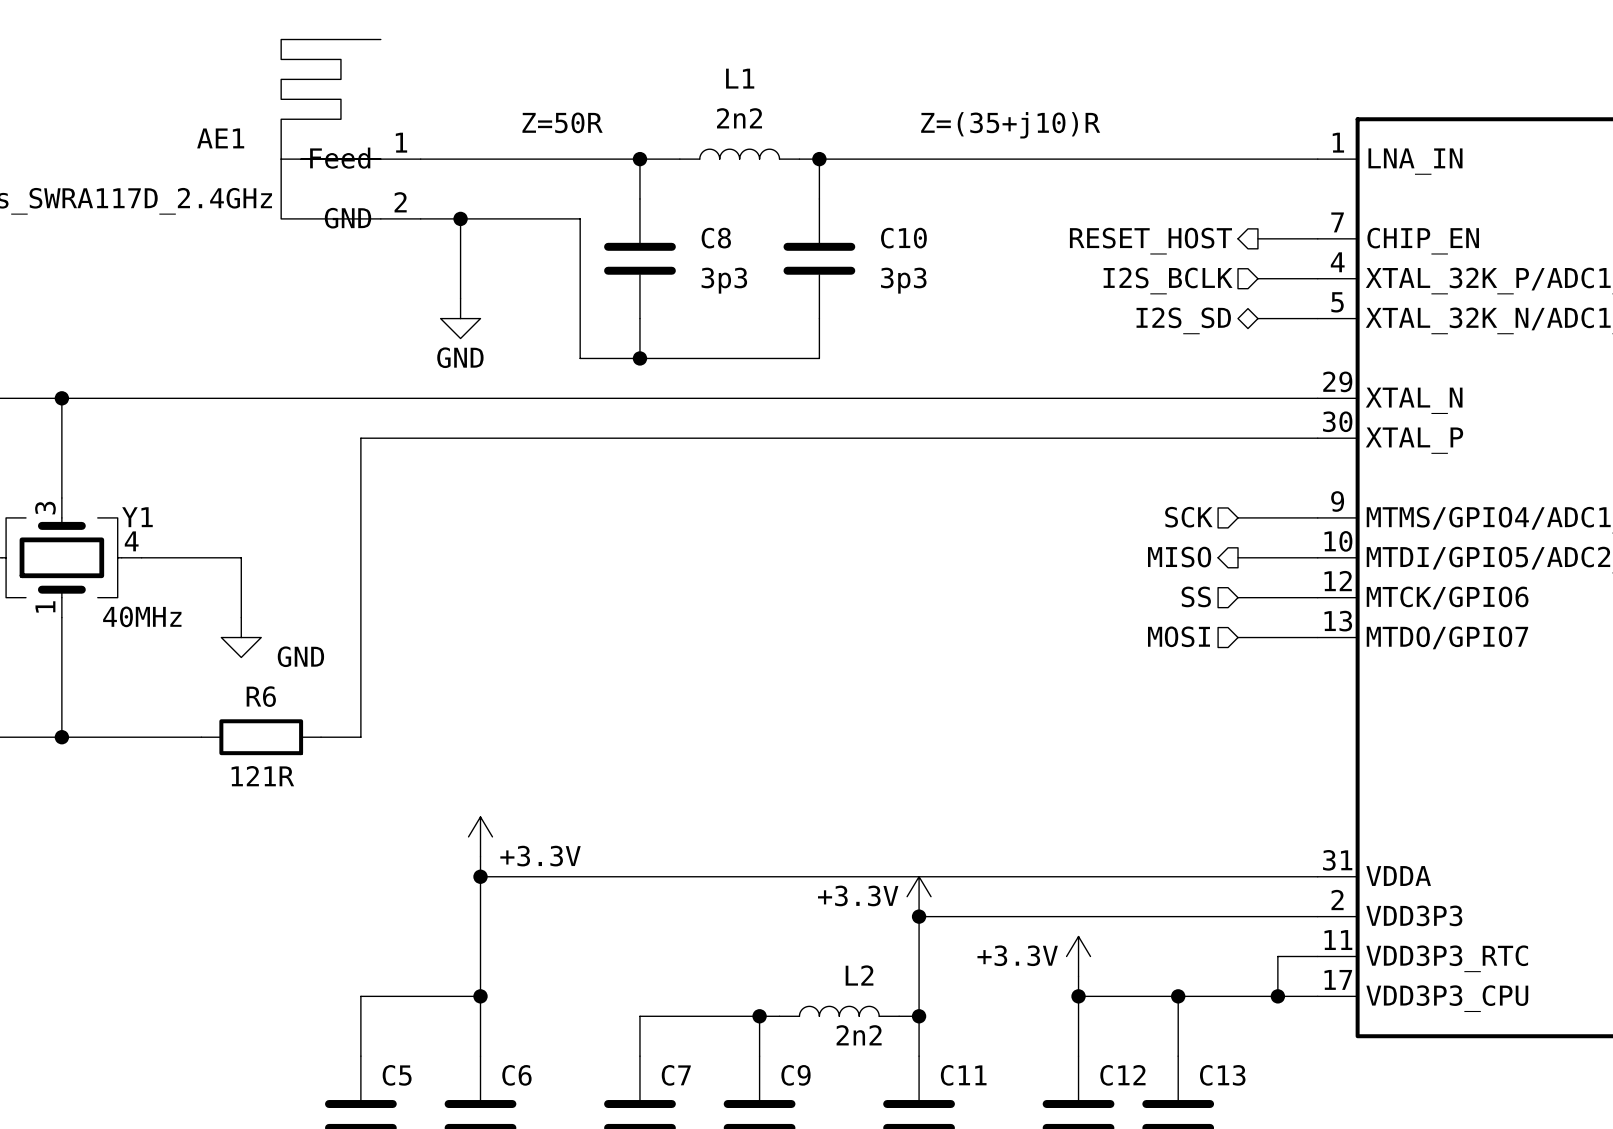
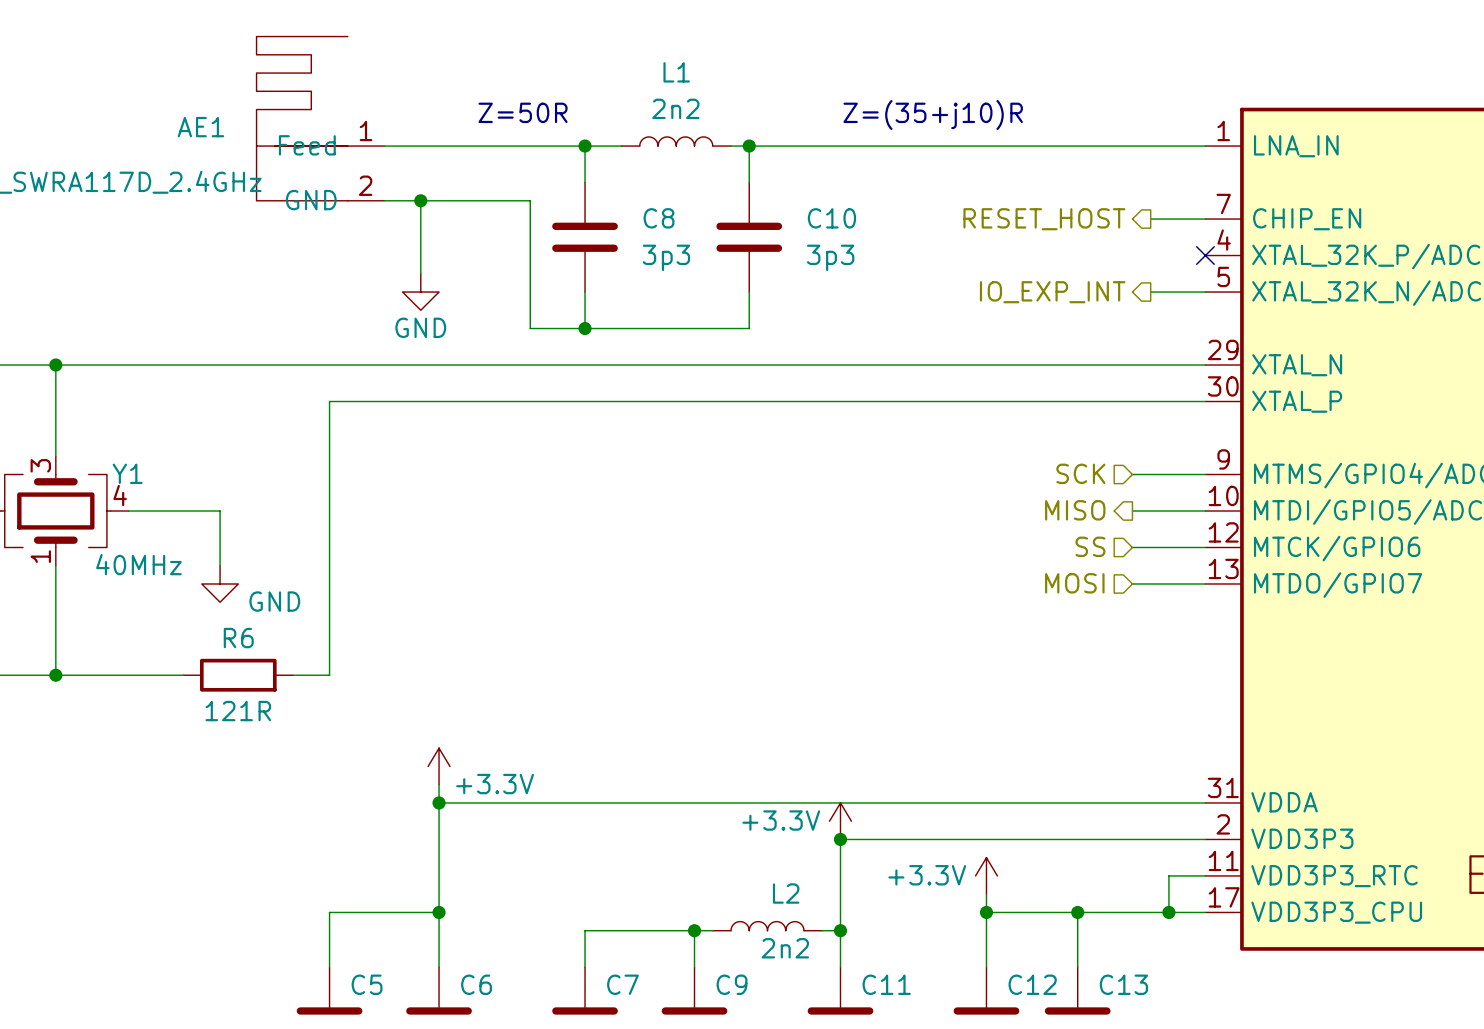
wire: (1257, 278) (1317, 278) -> none
no-connect mark: none -> (1205, 255)
hierarchical label: I2S_BCLK (1168, 281) -> none
hierarchical label shape: bidirectional (1183, 320) -> output (1052, 292)
hierarchical label: I2S_SD (1183, 320) -> IO_EXP_INT (1052, 292)

